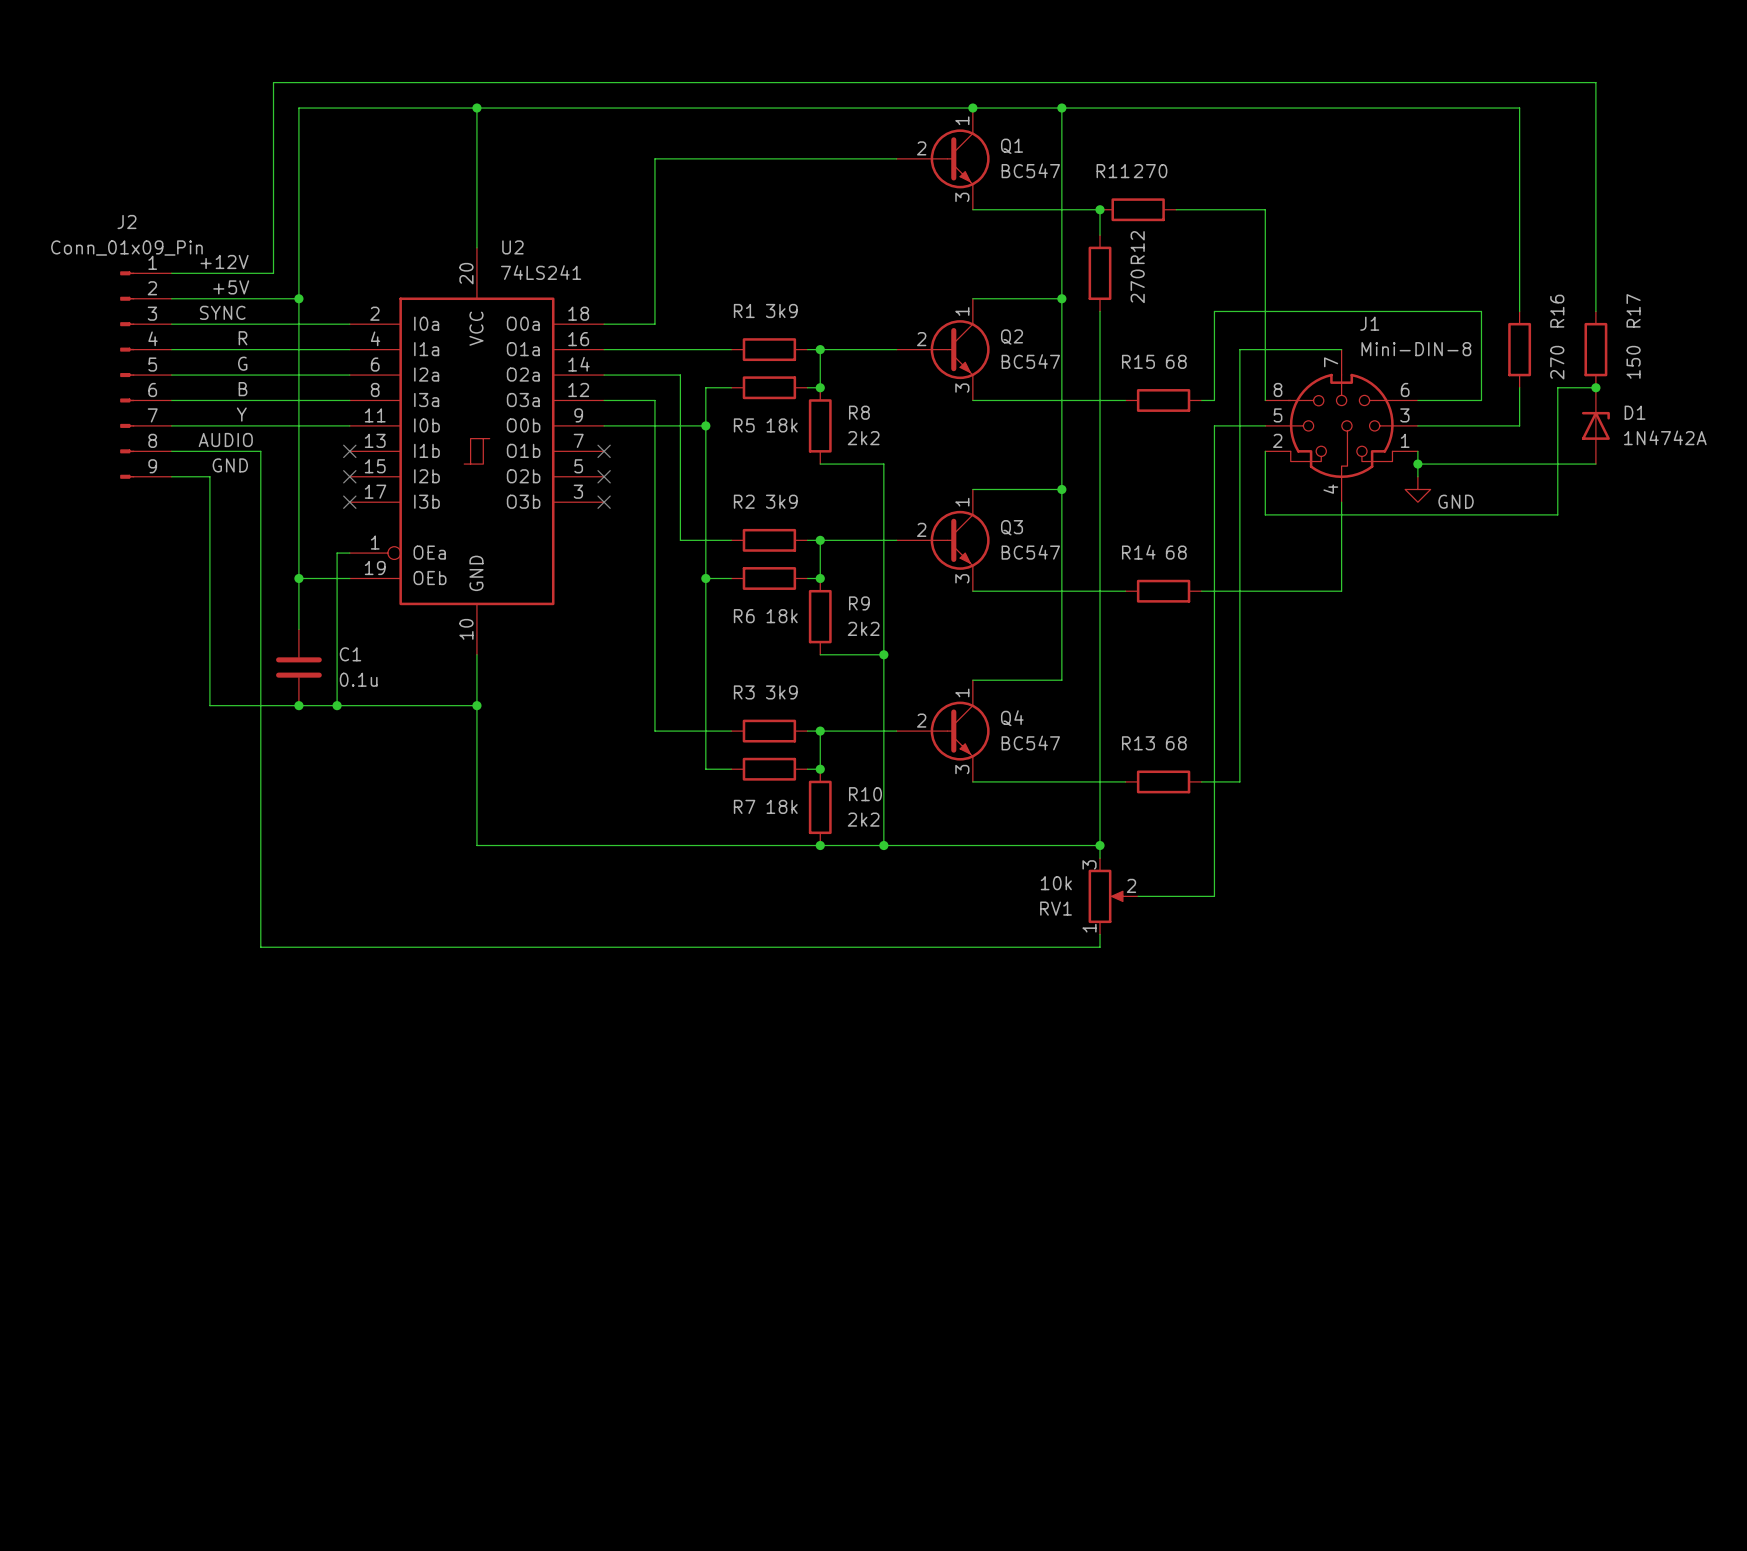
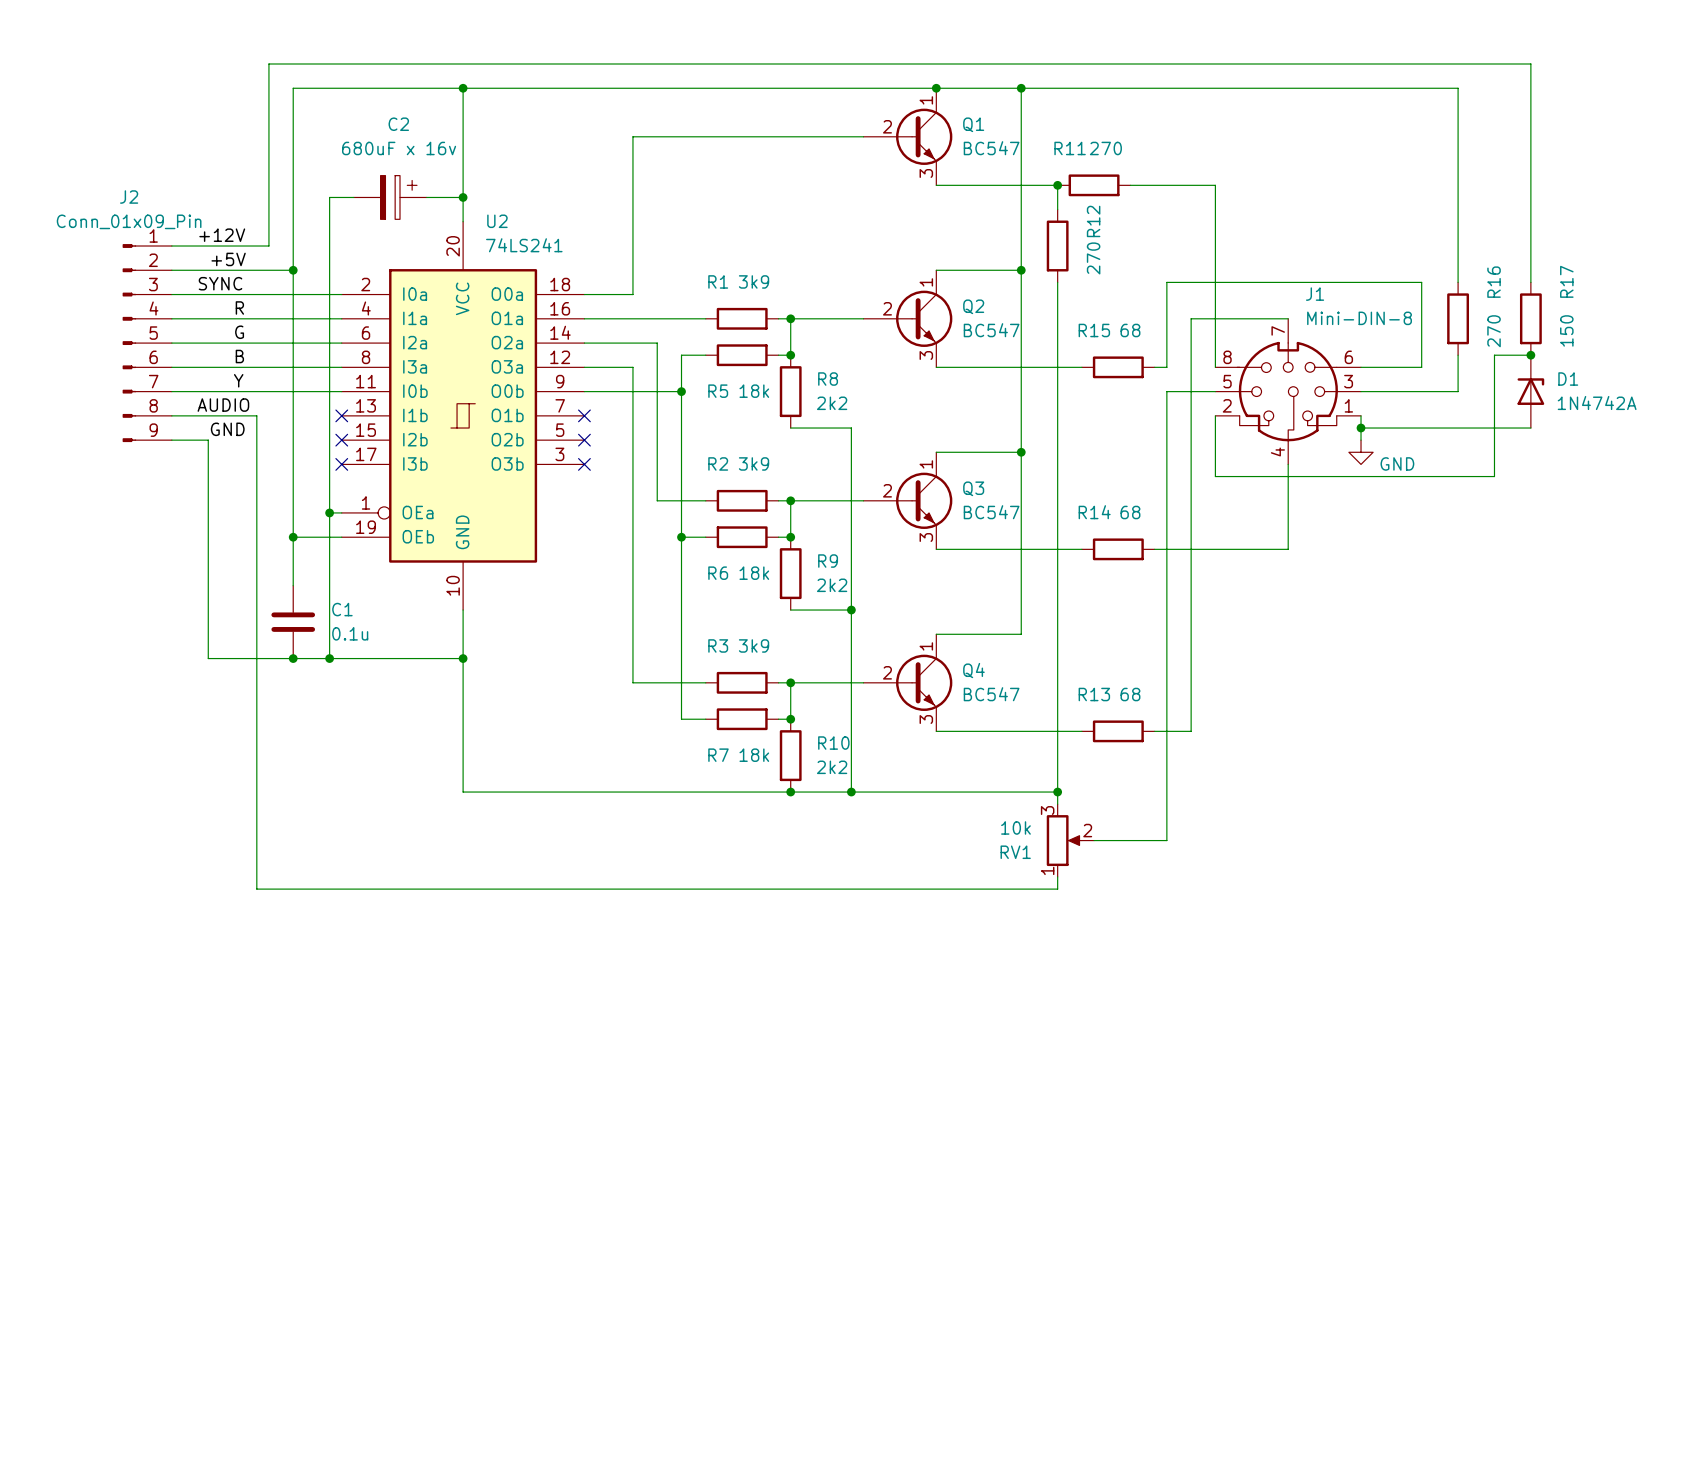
wire: none -> (353, 197) (329, 197) (329, 512)
C2: none -> 680uF x 16v (390, 197)
wire: none -> (426, 197) (463, 197)
junction: none -> (463, 197)
junction: none -> (329, 512)

